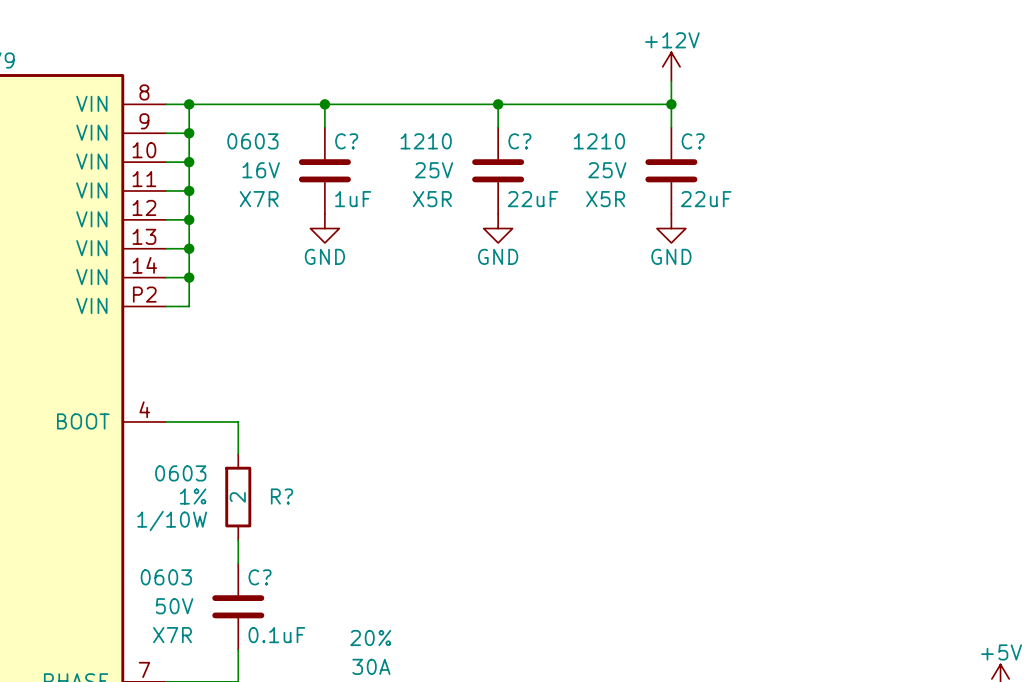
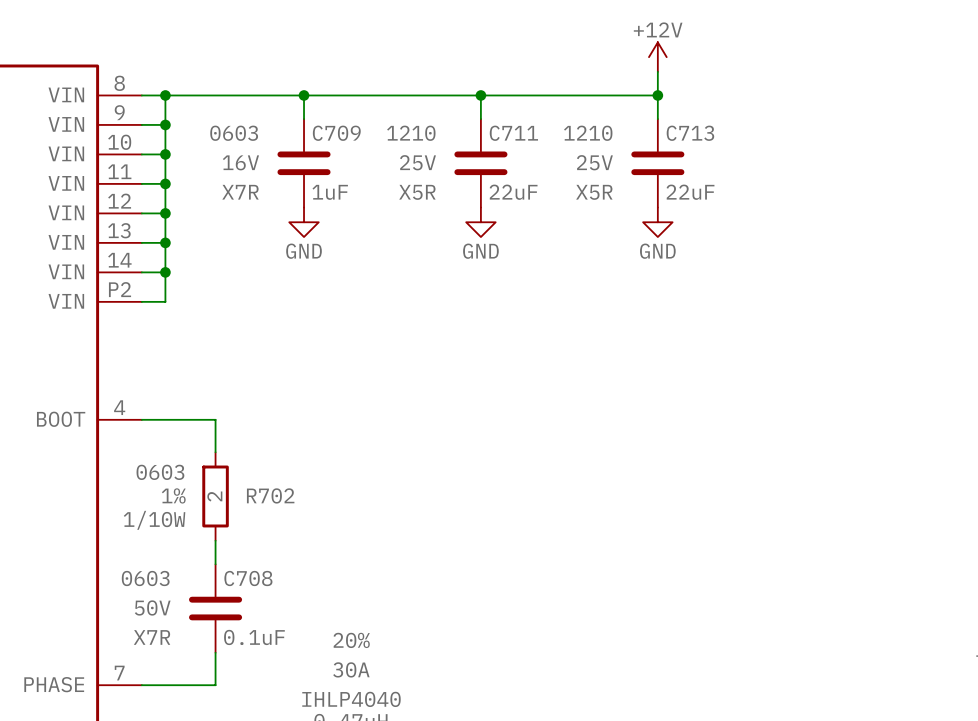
C? name: C? (346, 141) -> C709 (336, 133)
C? name: C? (519, 141) -> C711 (513, 133)
C? name: C? (693, 141) -> C713 (690, 133)
R? name: R? (282, 496) -> R702 (270, 495)
C? name: C? (260, 577) -> C708 (248, 578)

